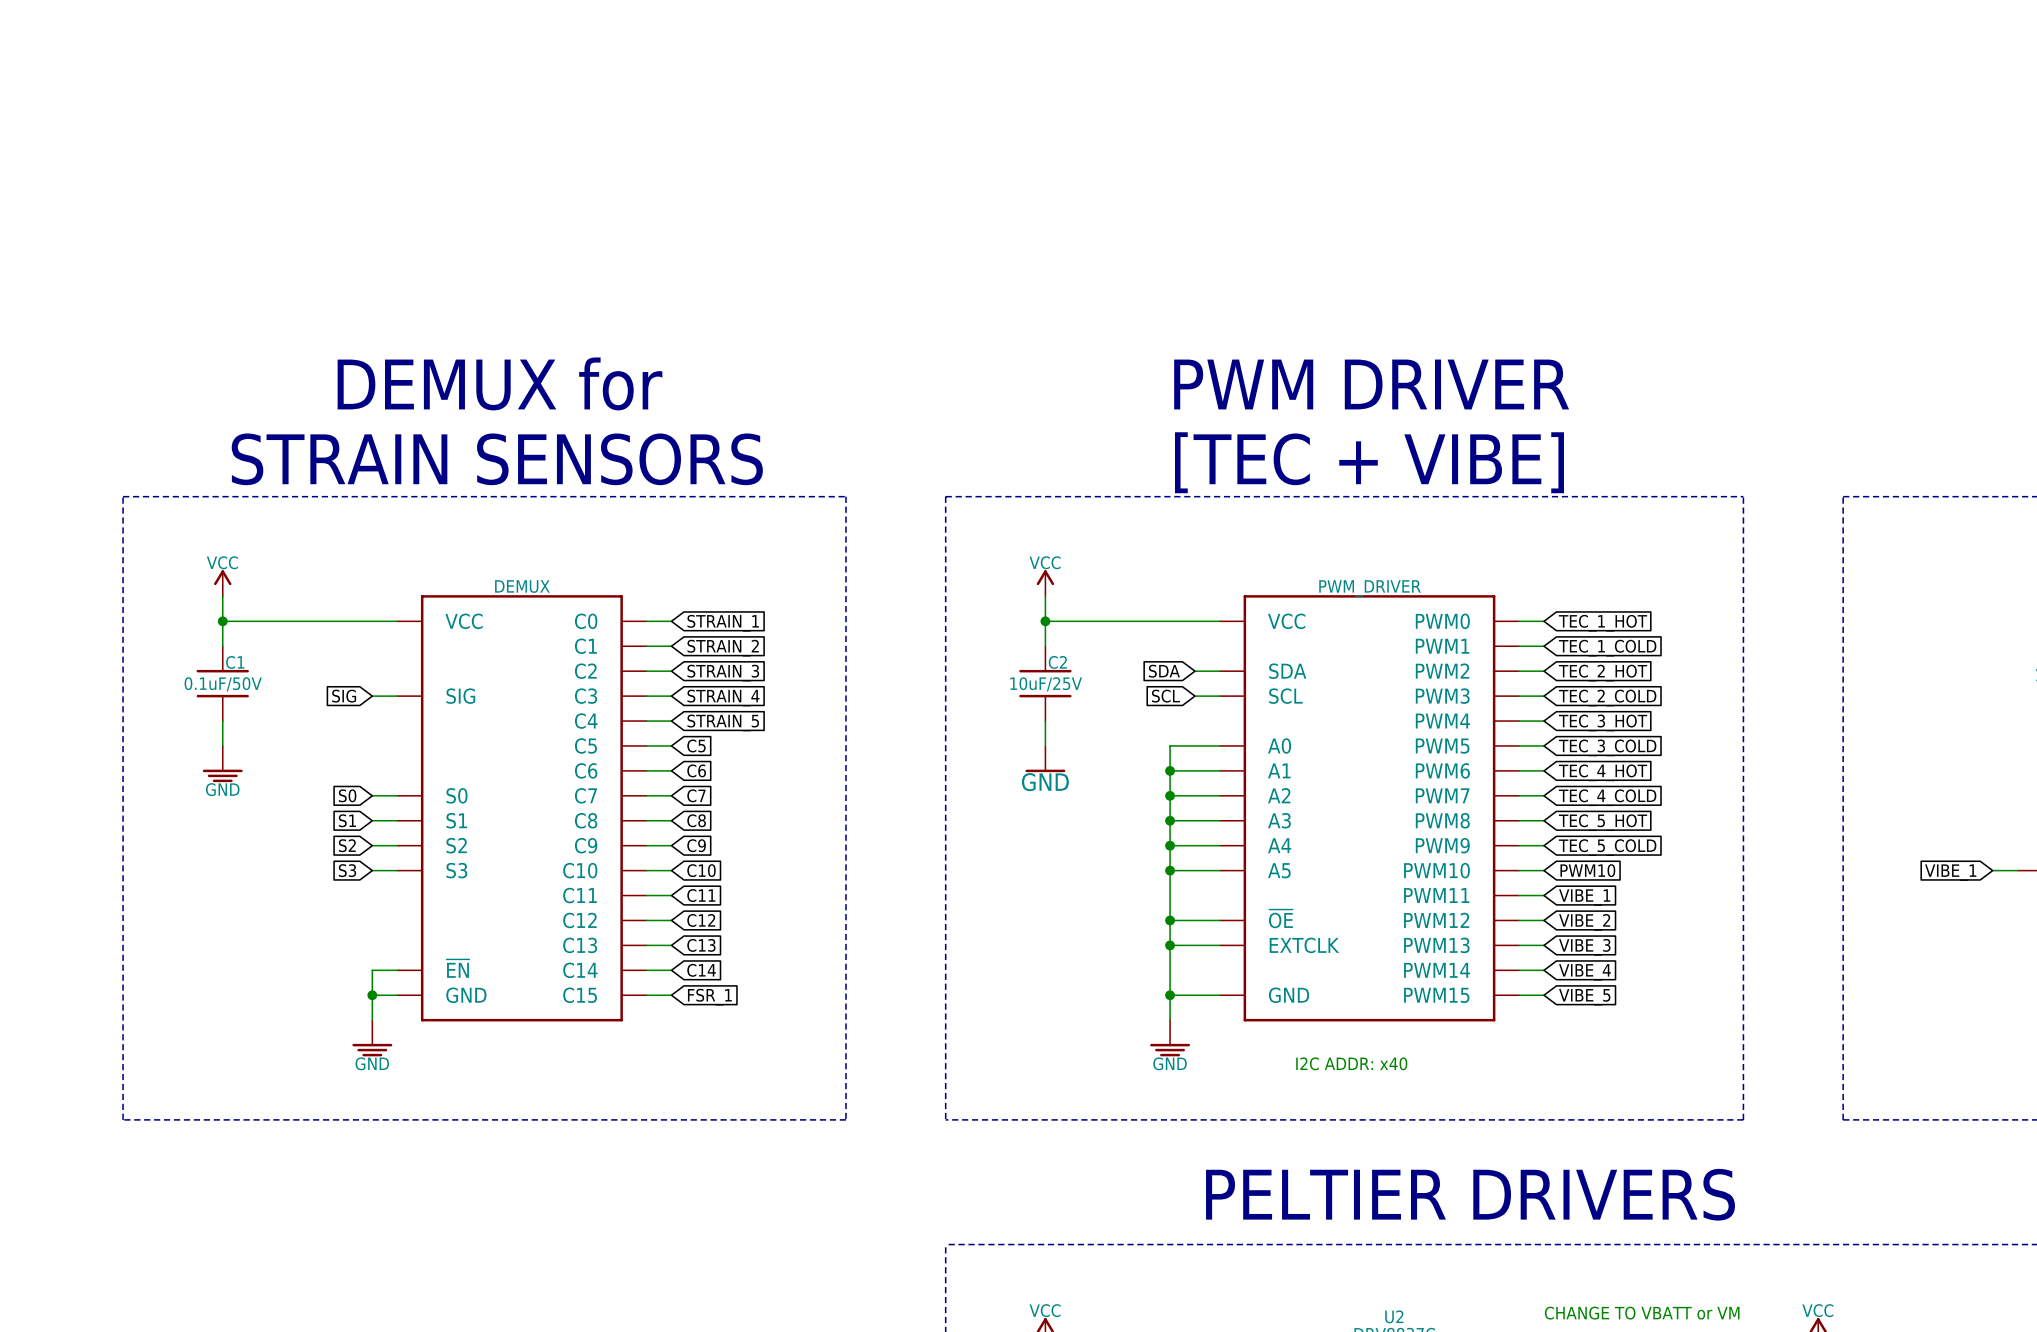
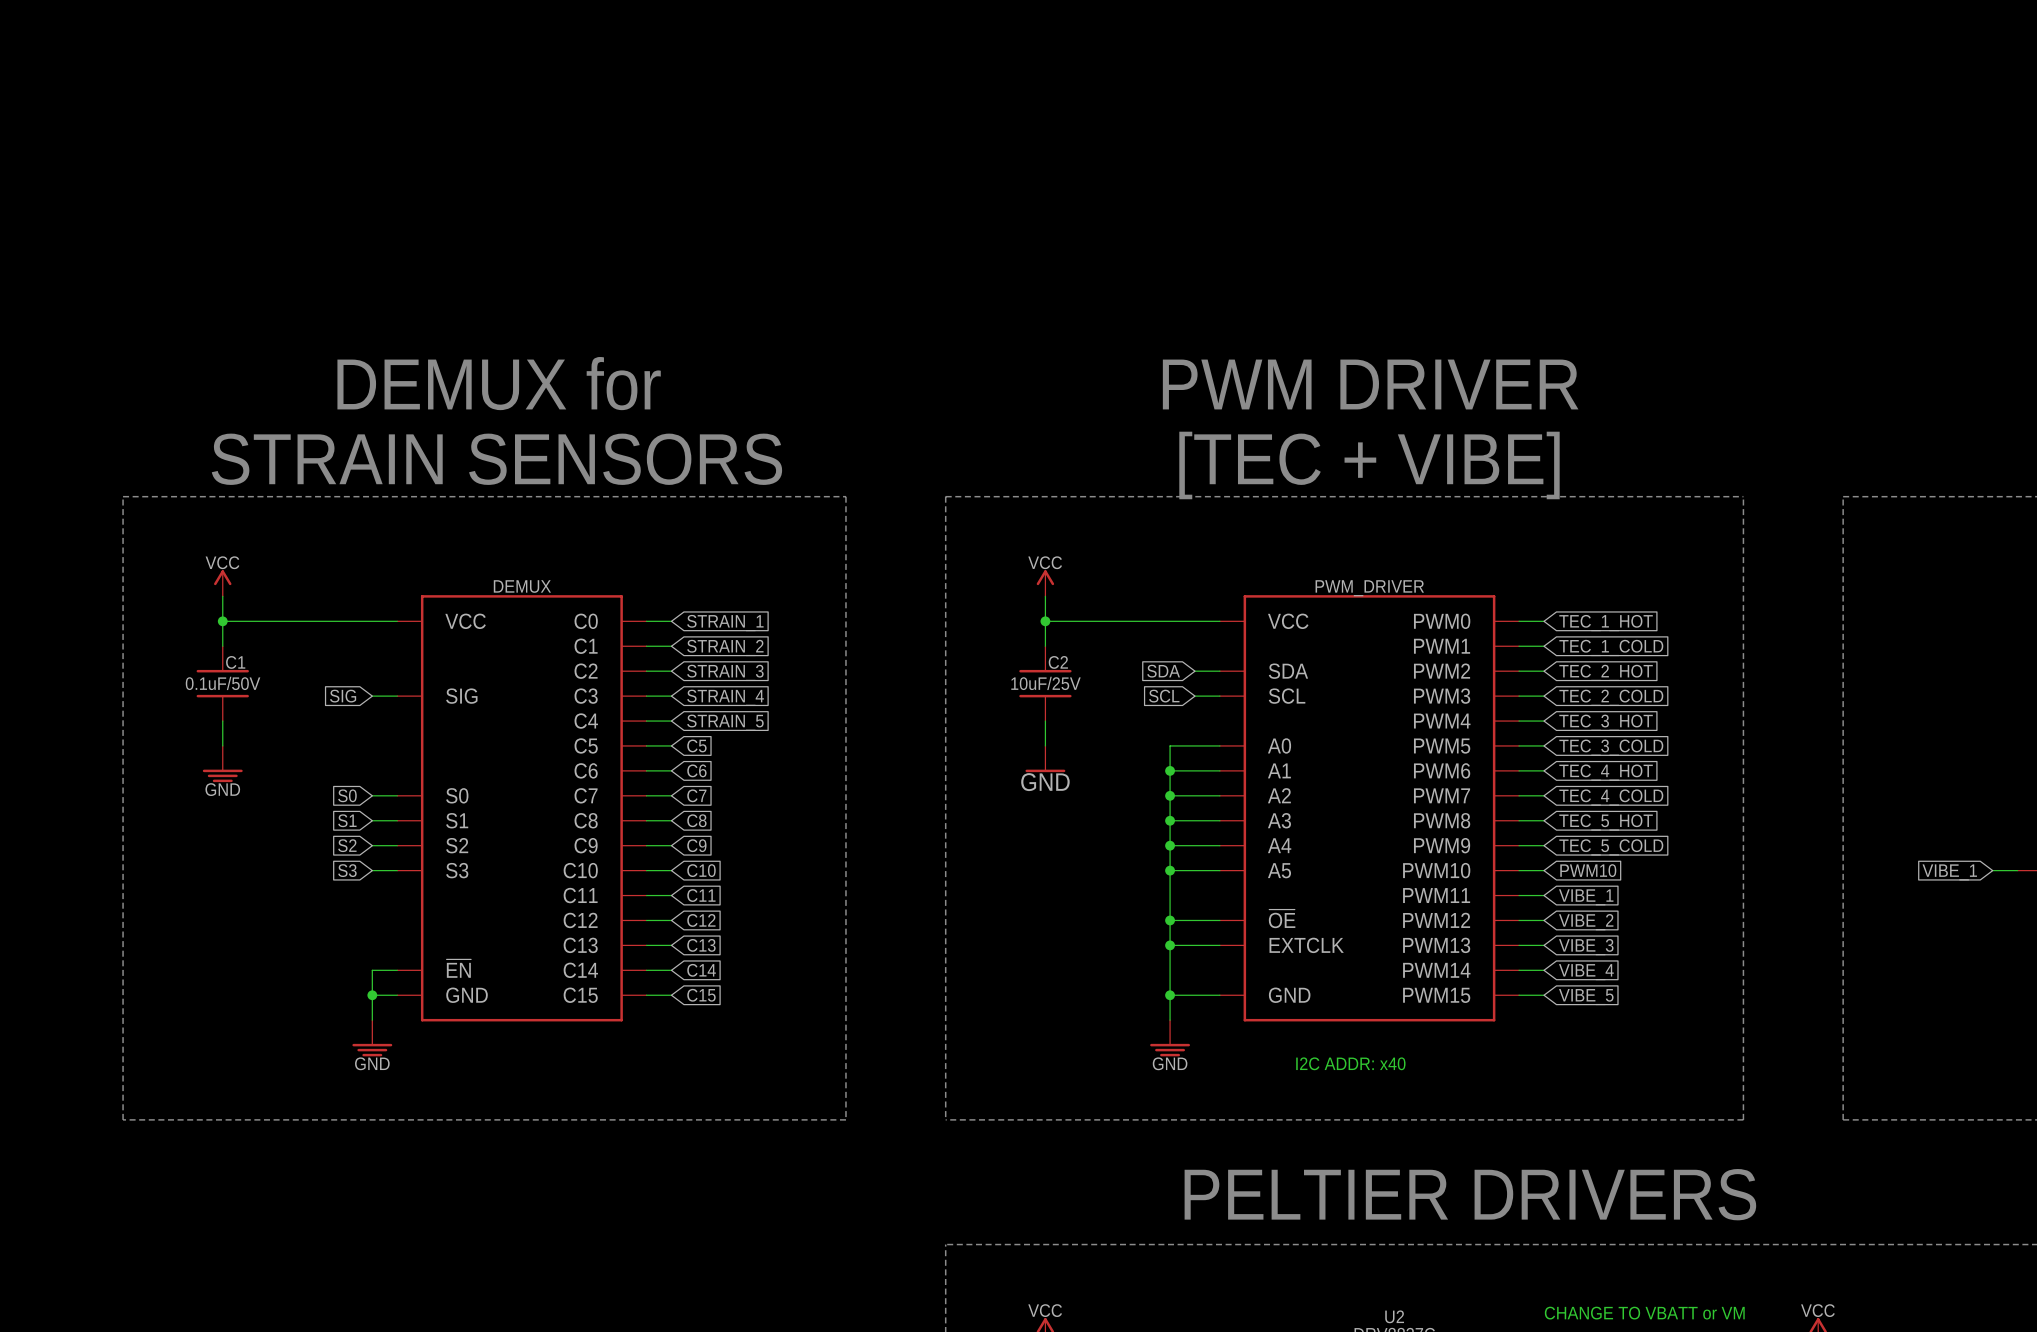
global label: FSR_1 (709, 997) -> C15 (701, 995)

